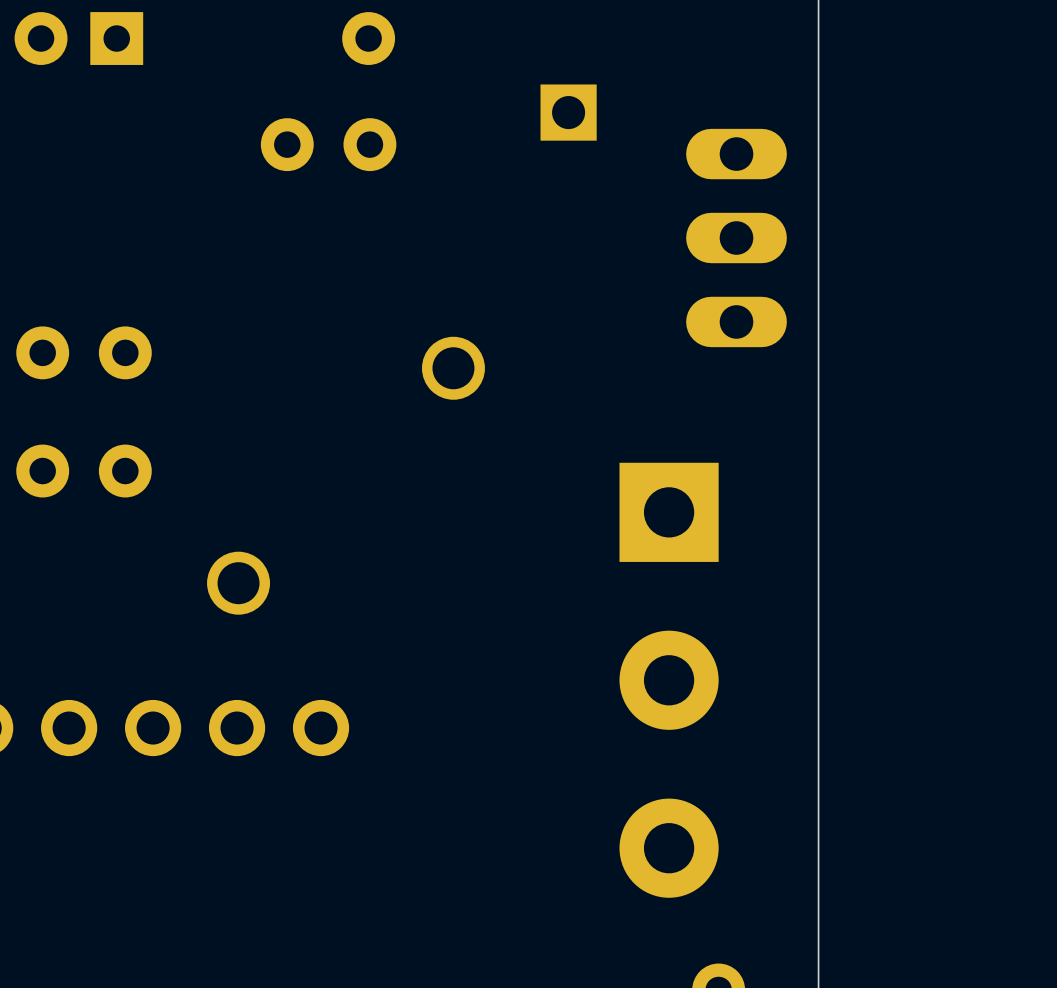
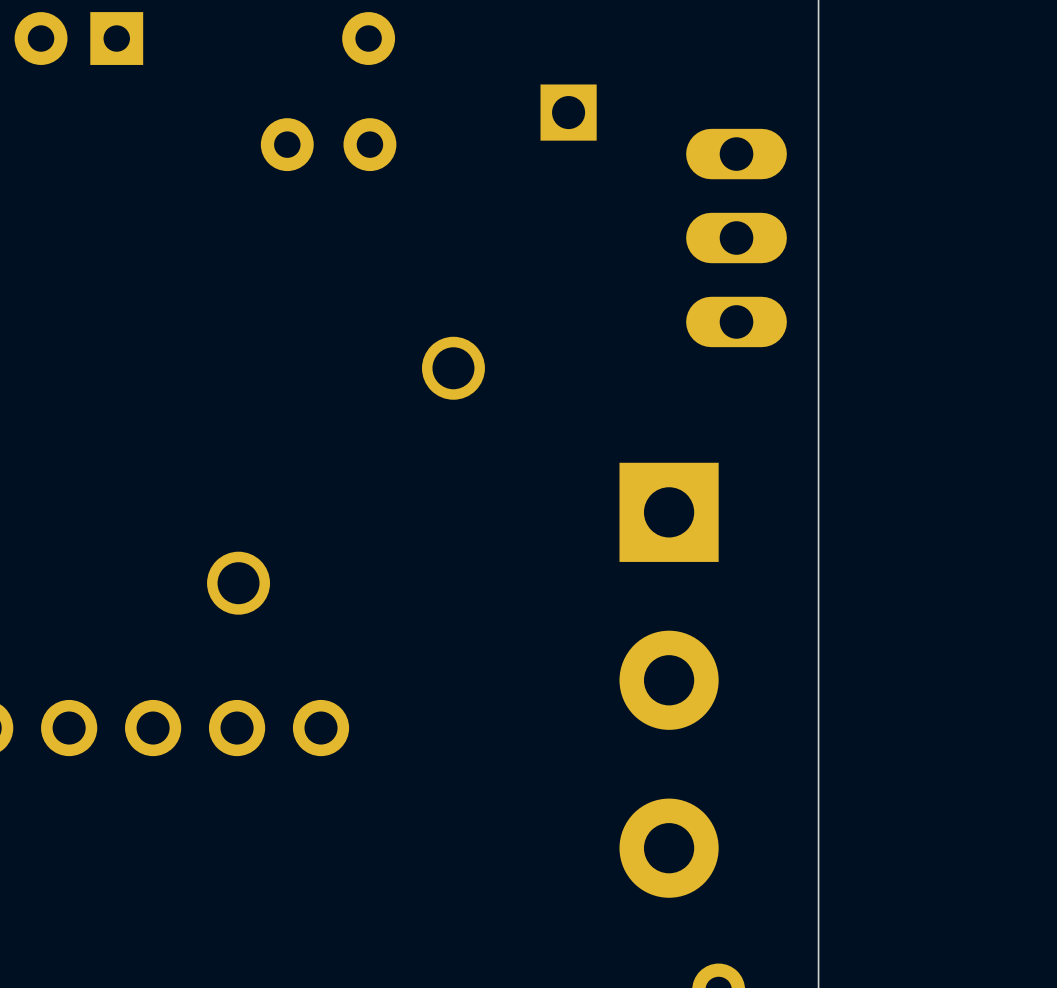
part: (84, 352) -> none
part: (84, 471) -> none

